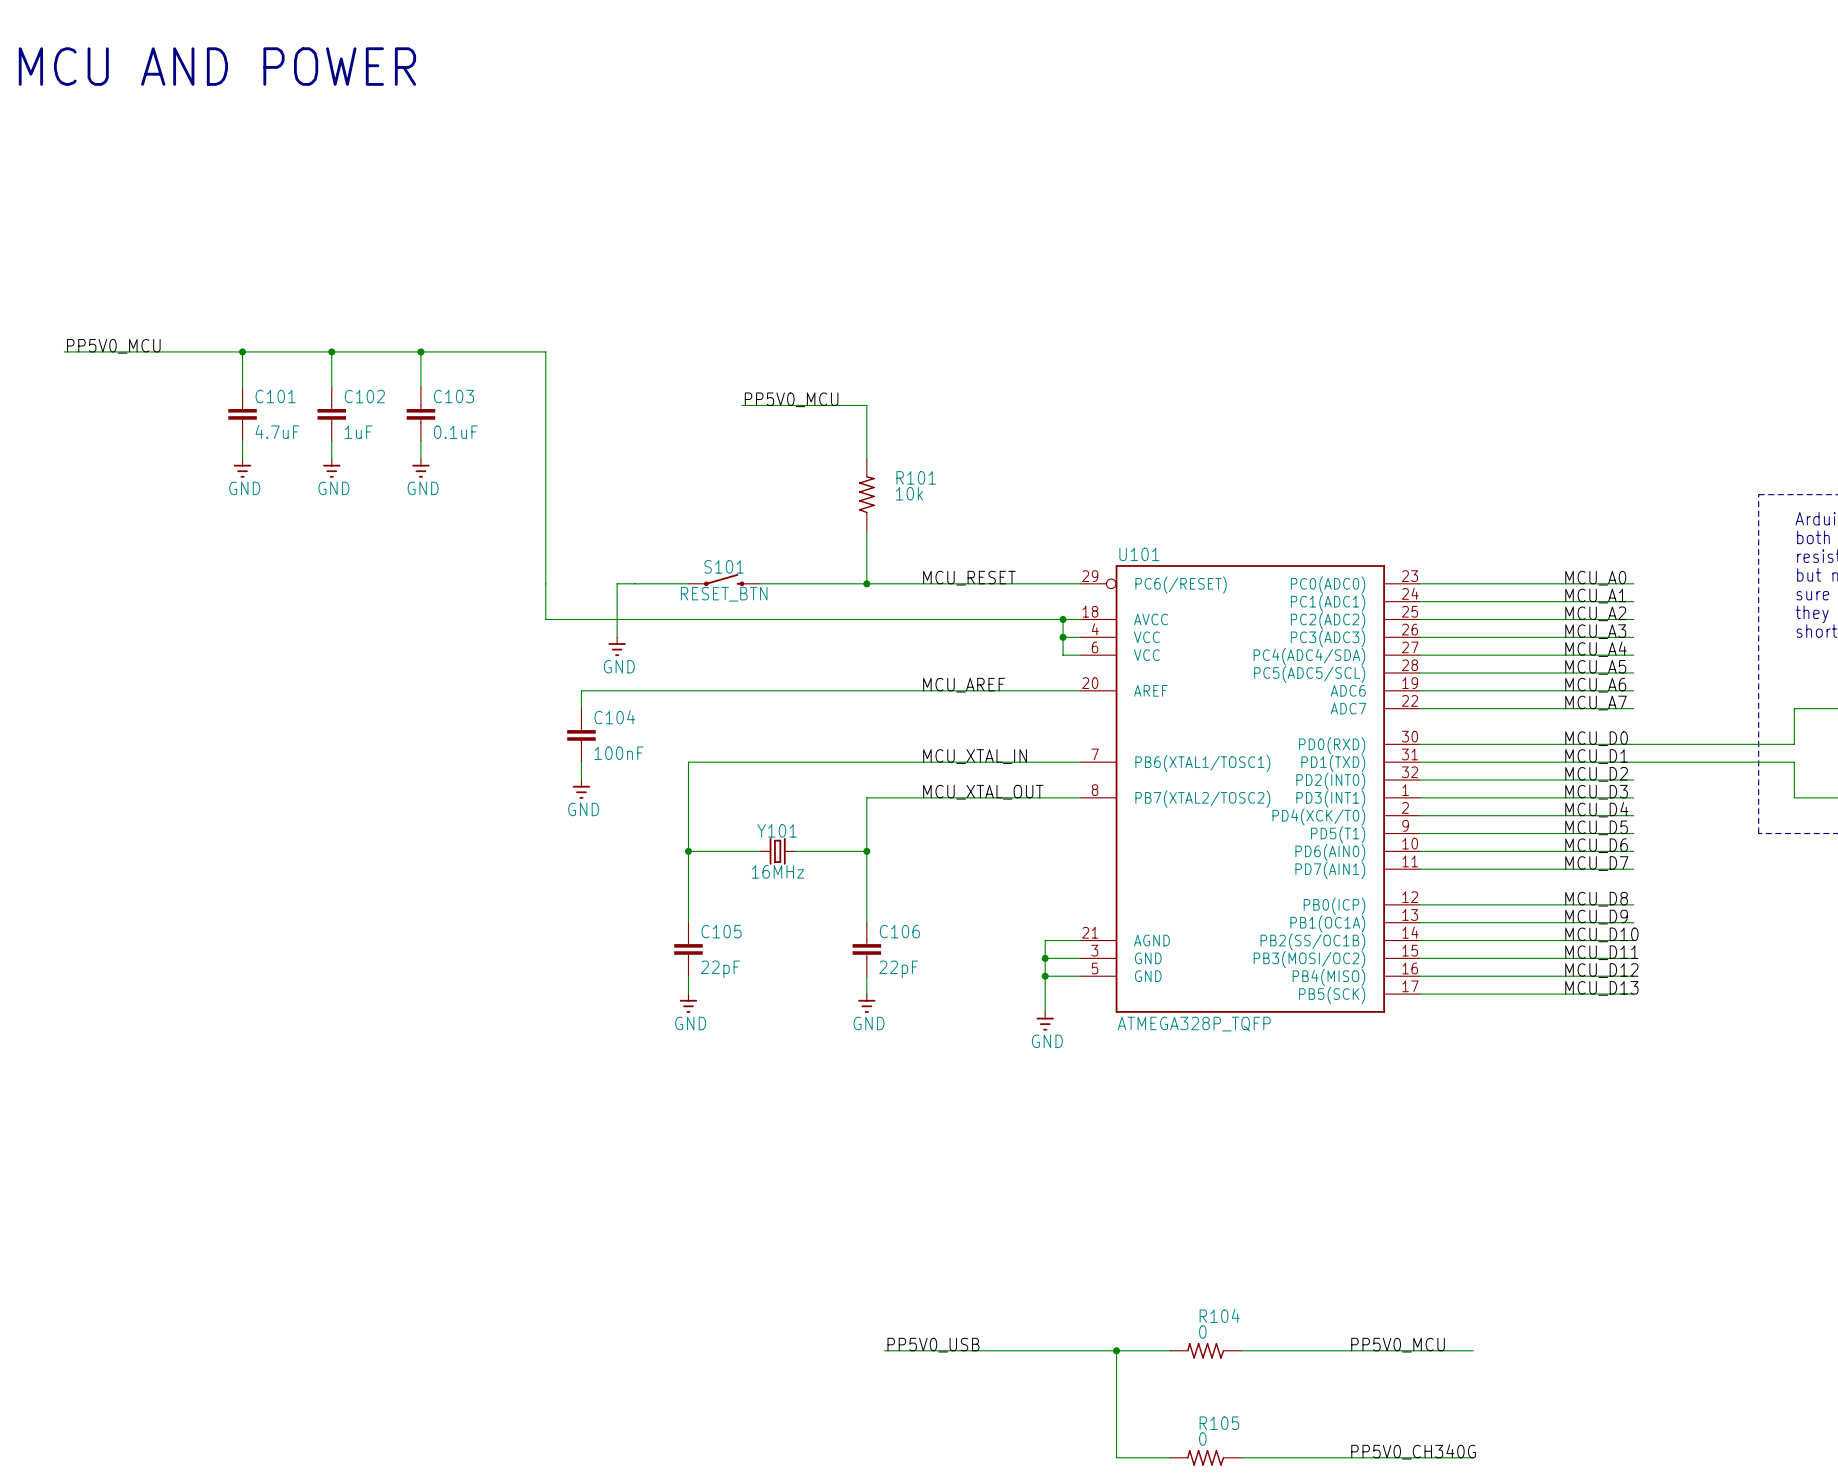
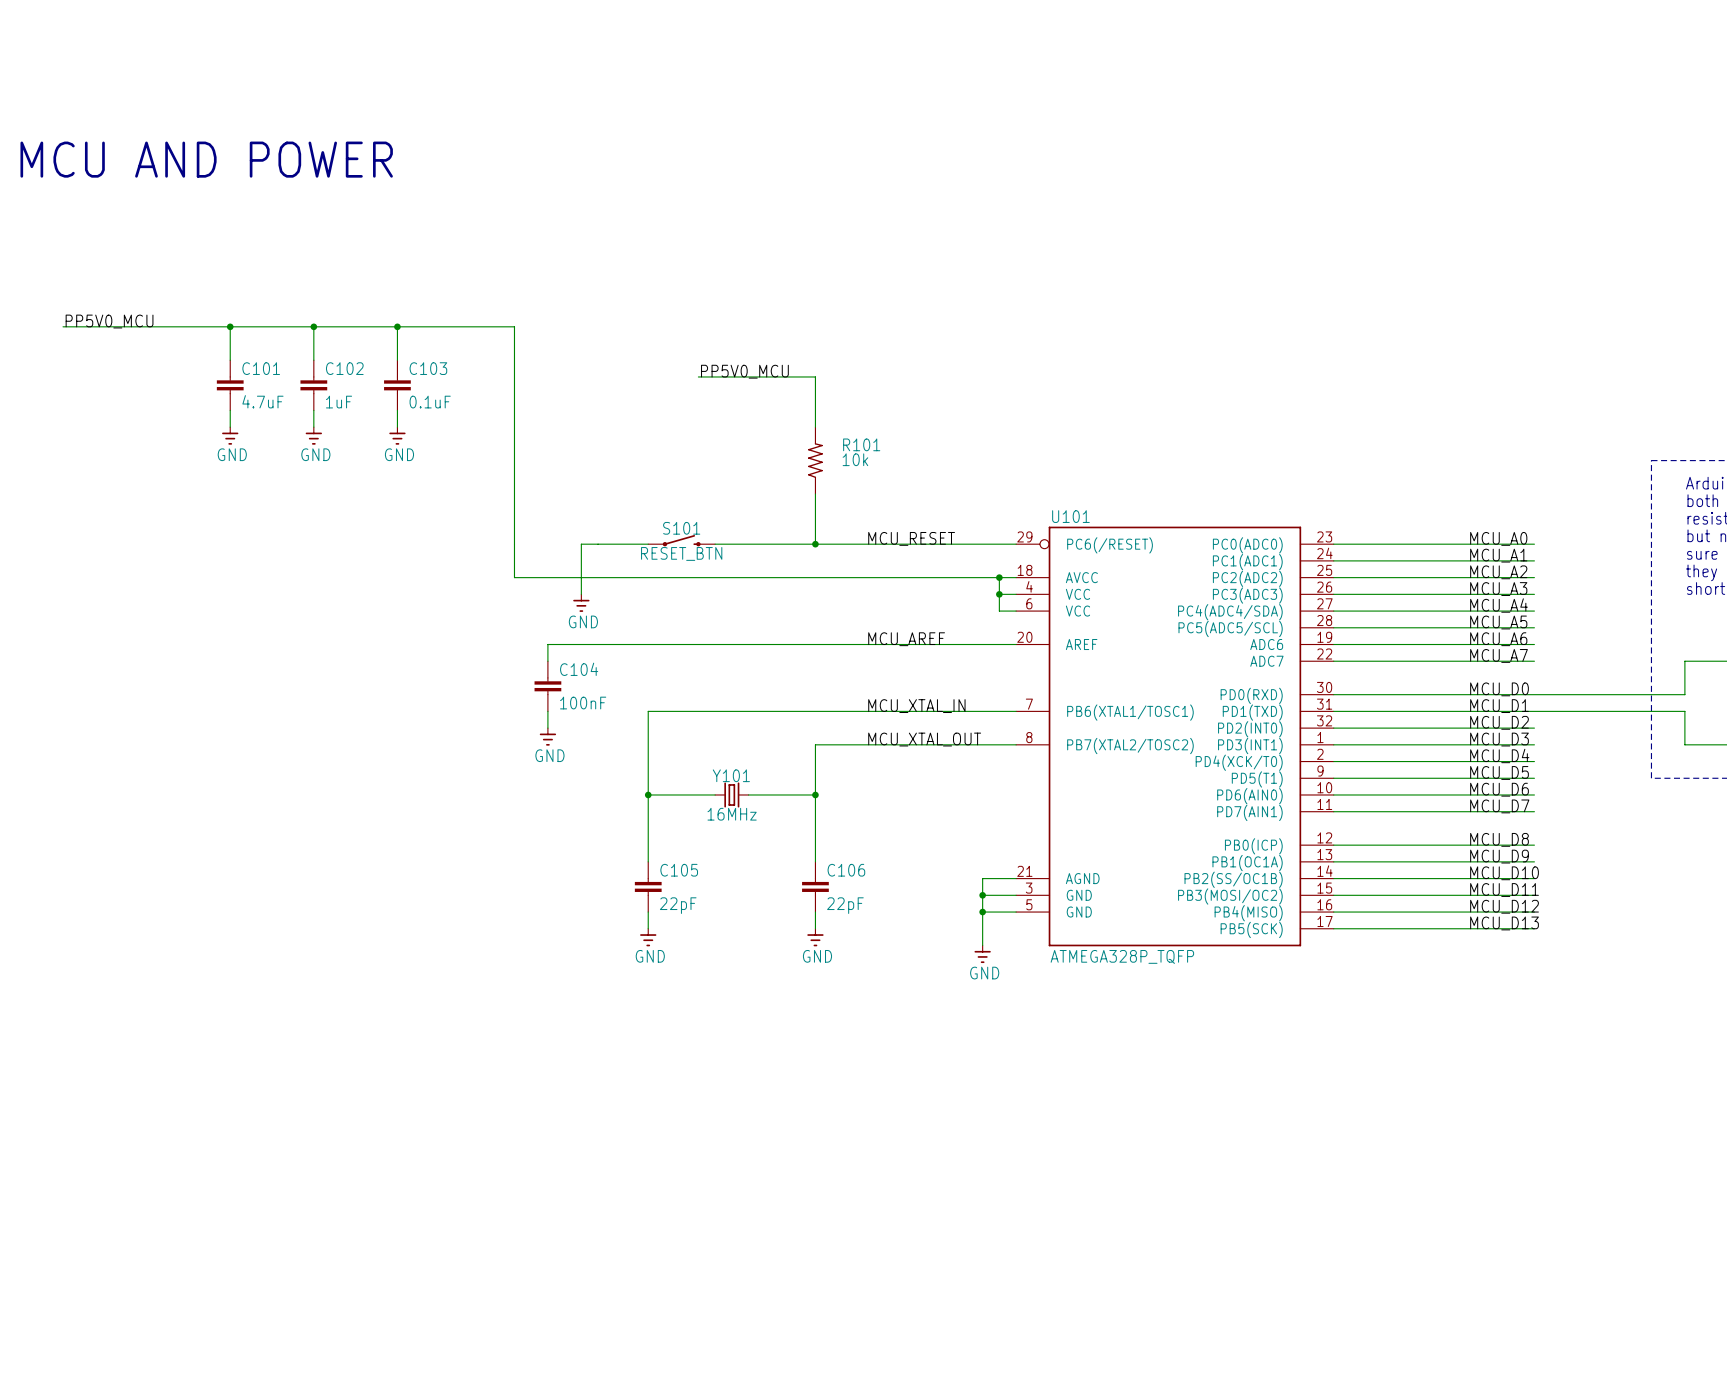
text position: MCU AND POWER (217, 66) -> MCU AND POWER (206, 159)
label: PP5V0_USB (933, 1345) -> none
label: PP5V0_MCU (1398, 1345) -> none
wire: (884, 1350) (1170, 1350) -> none
wire: (1116, 1350) (1116, 1457) (1170, 1457) -> none
junction: (1116, 1350) -> none
R104: 0 (1205, 1350) -> none
wire: (1241, 1350) (1473, 1350) -> none
label: PP5V0_CH340G (1413, 1451) -> none
R105: 0 (1205, 1457) -> none
wire: (1241, 1457) (1473, 1457) -> none

